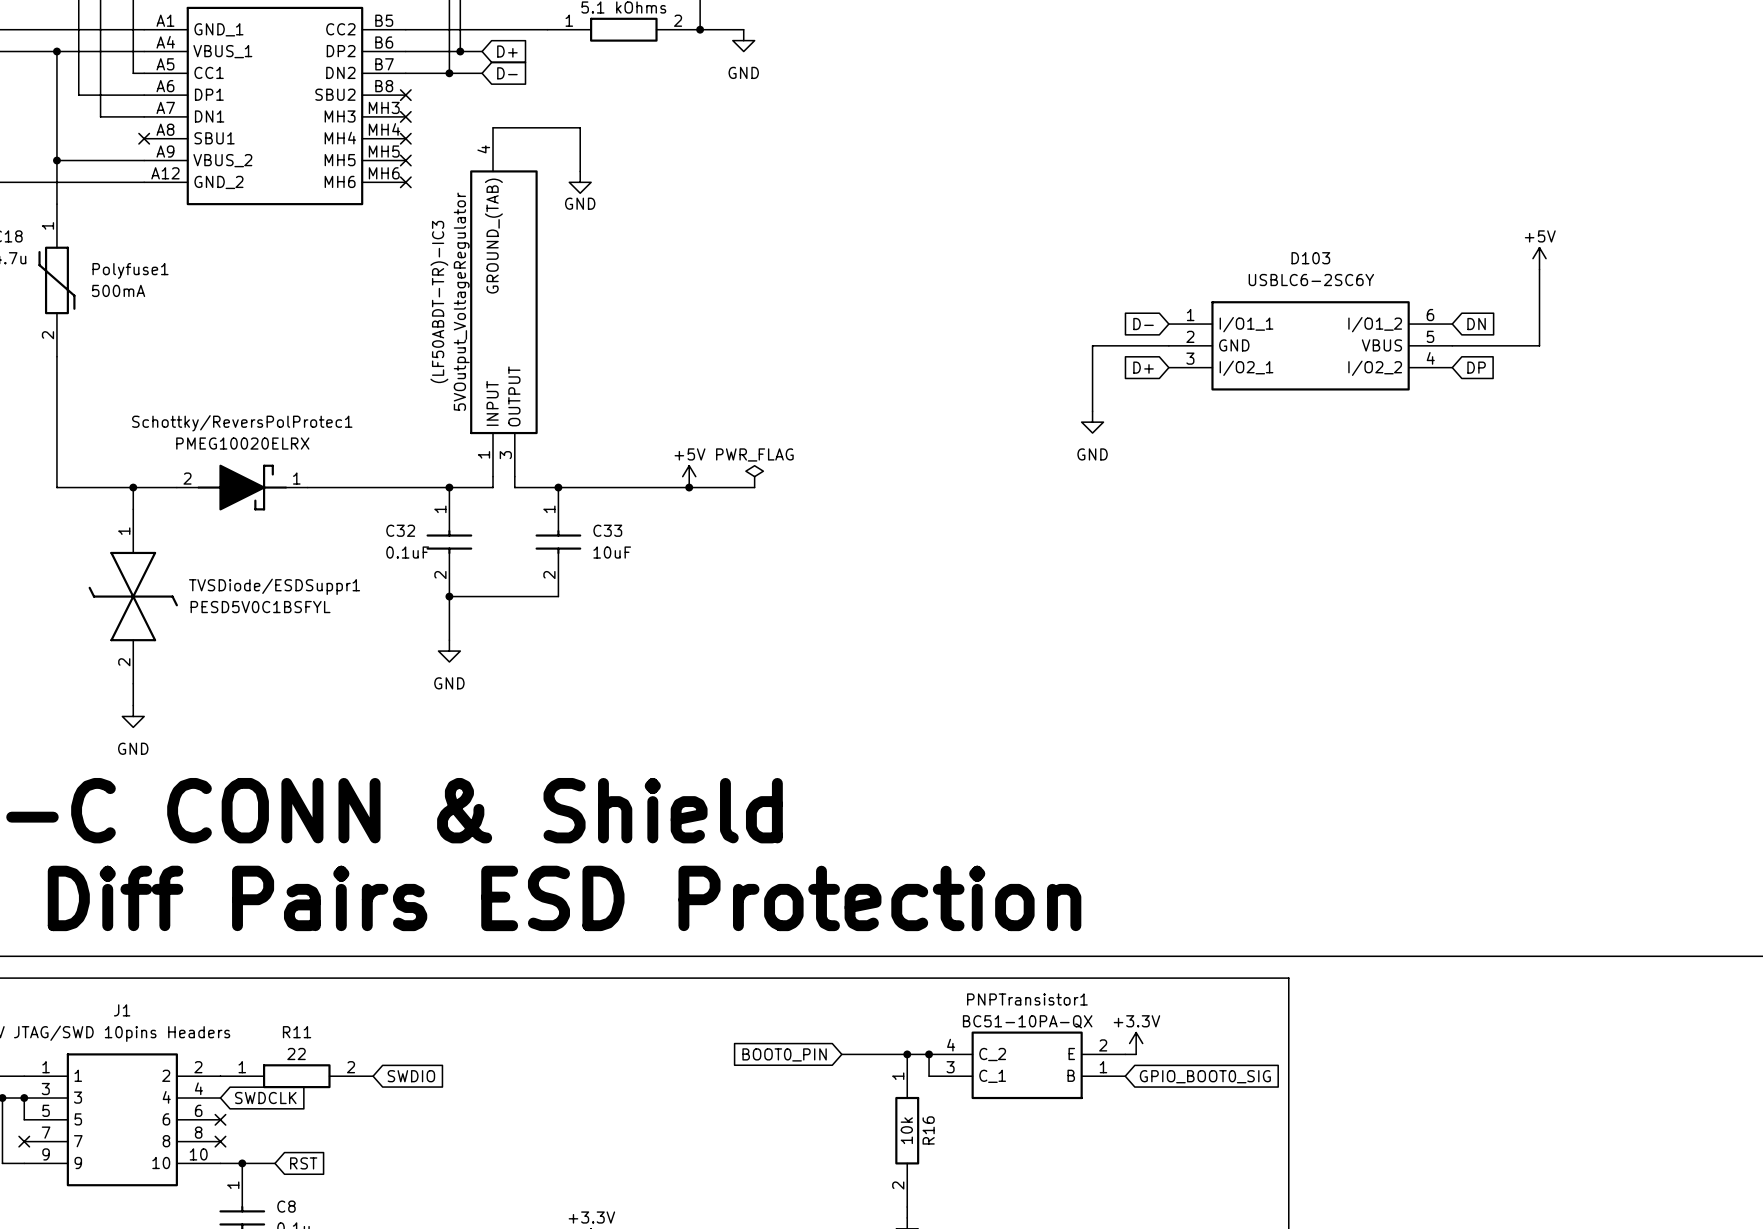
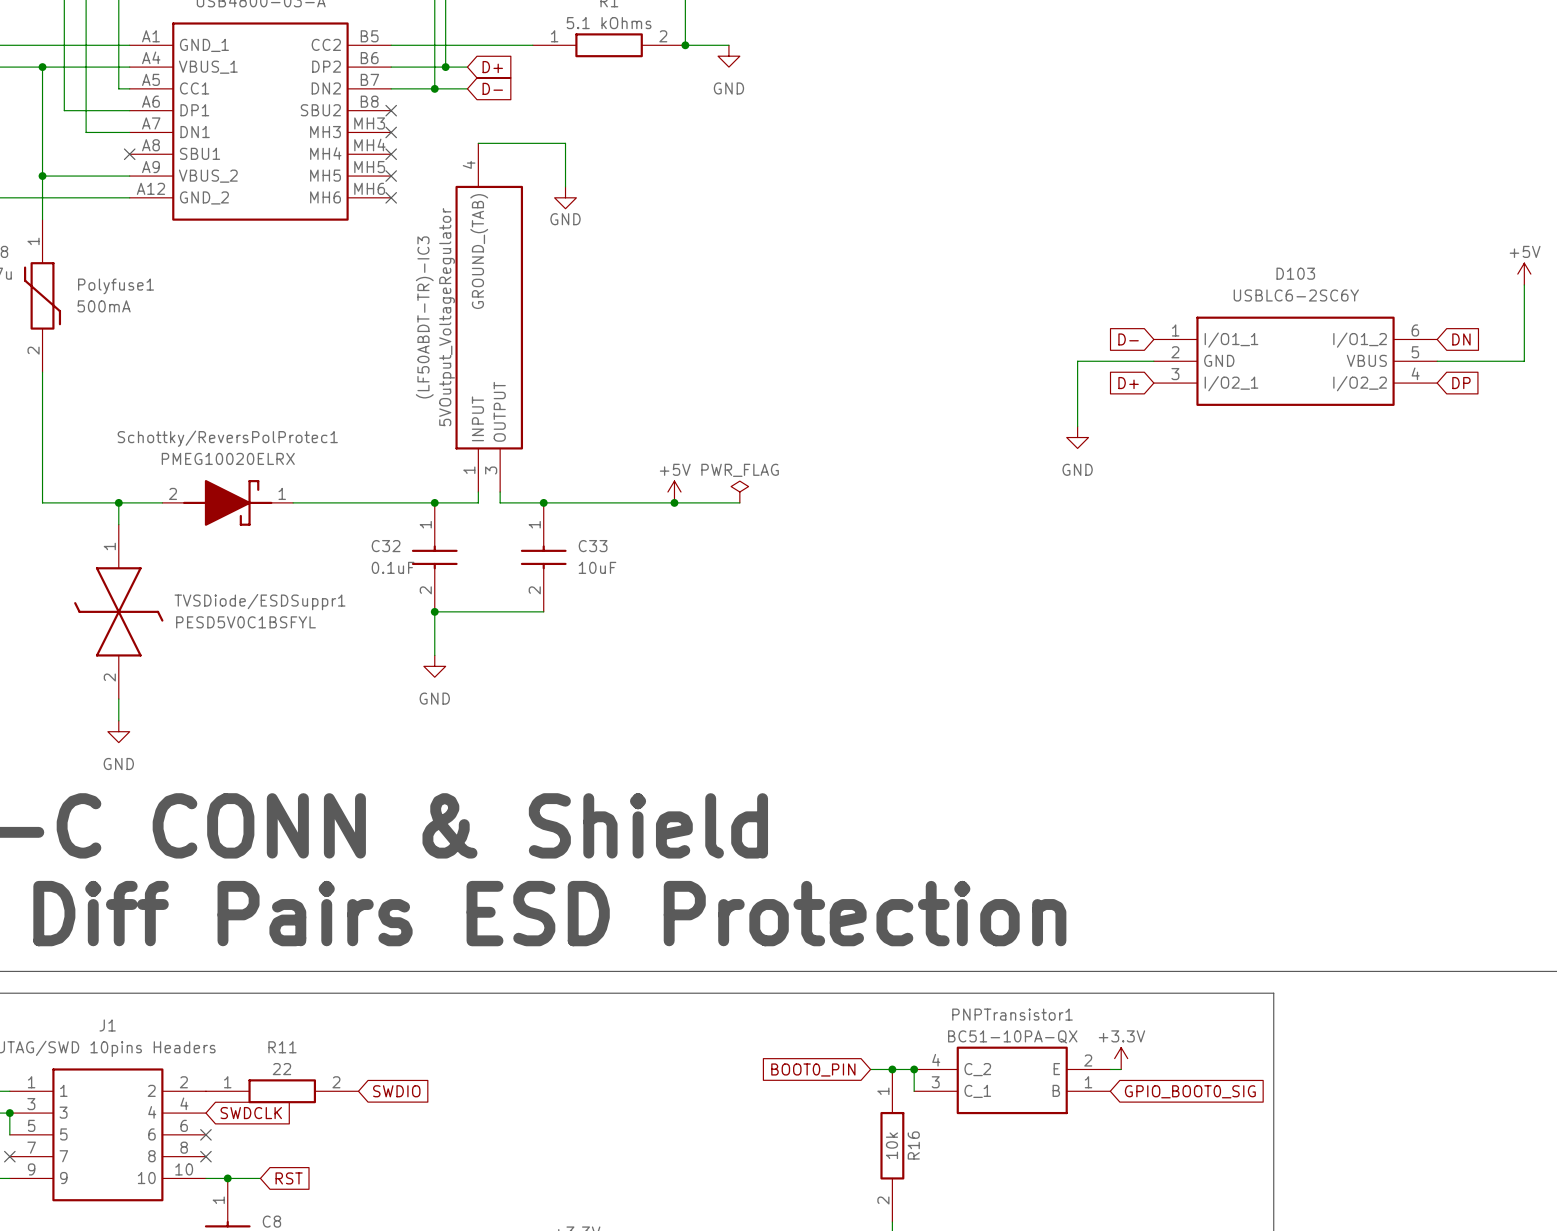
global label position: BOOT0_PIN (784, 1054) -> BOOT0_PIN (813, 1070)
wire: (841, 1054) (885, 1054) -> none

